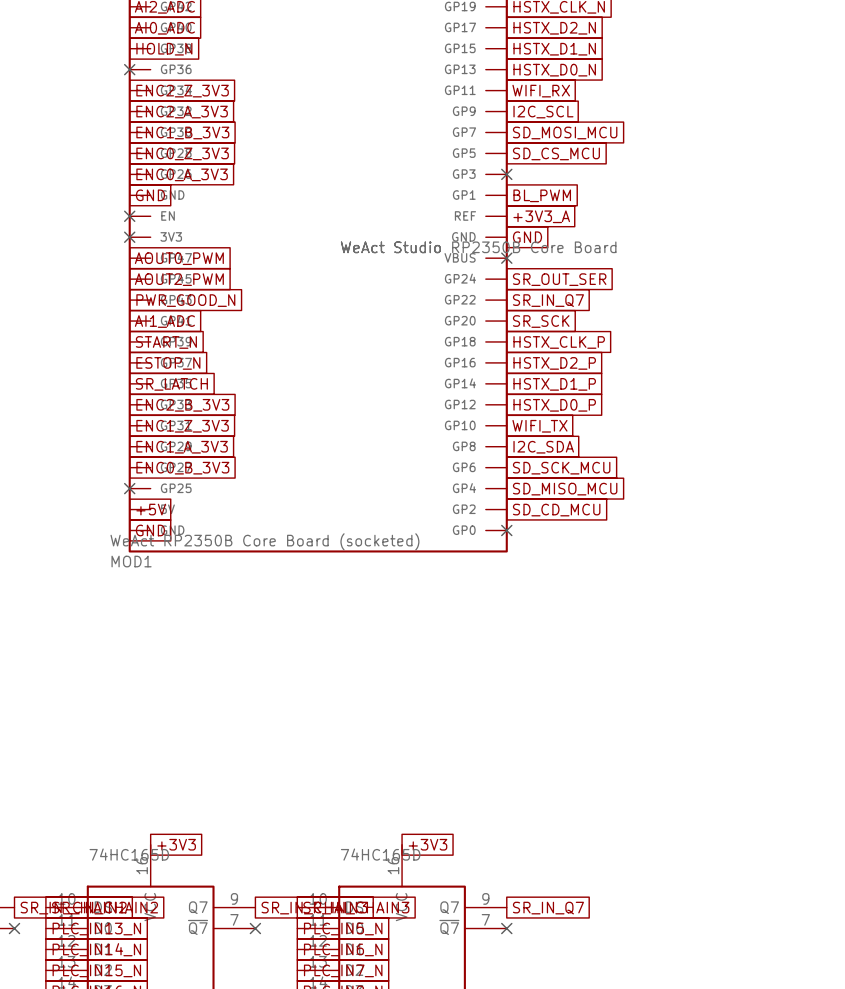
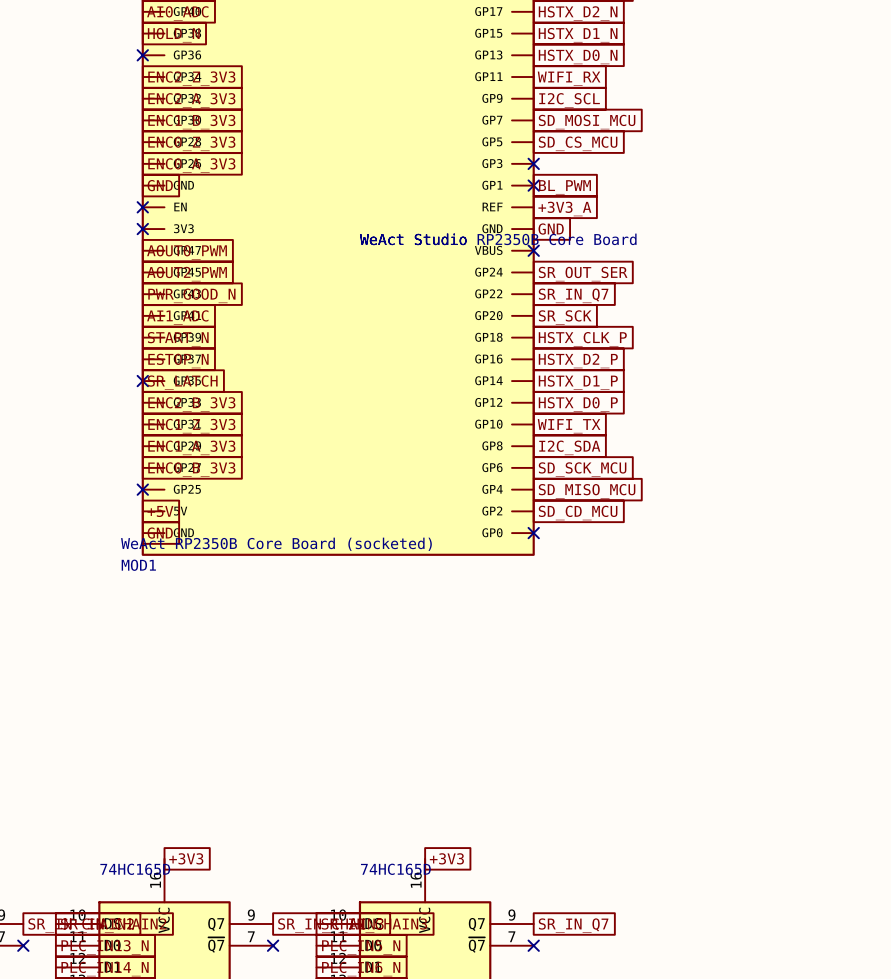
no-connect mark: none -> (533, 185)
no-connect mark: none -> (142, 381)

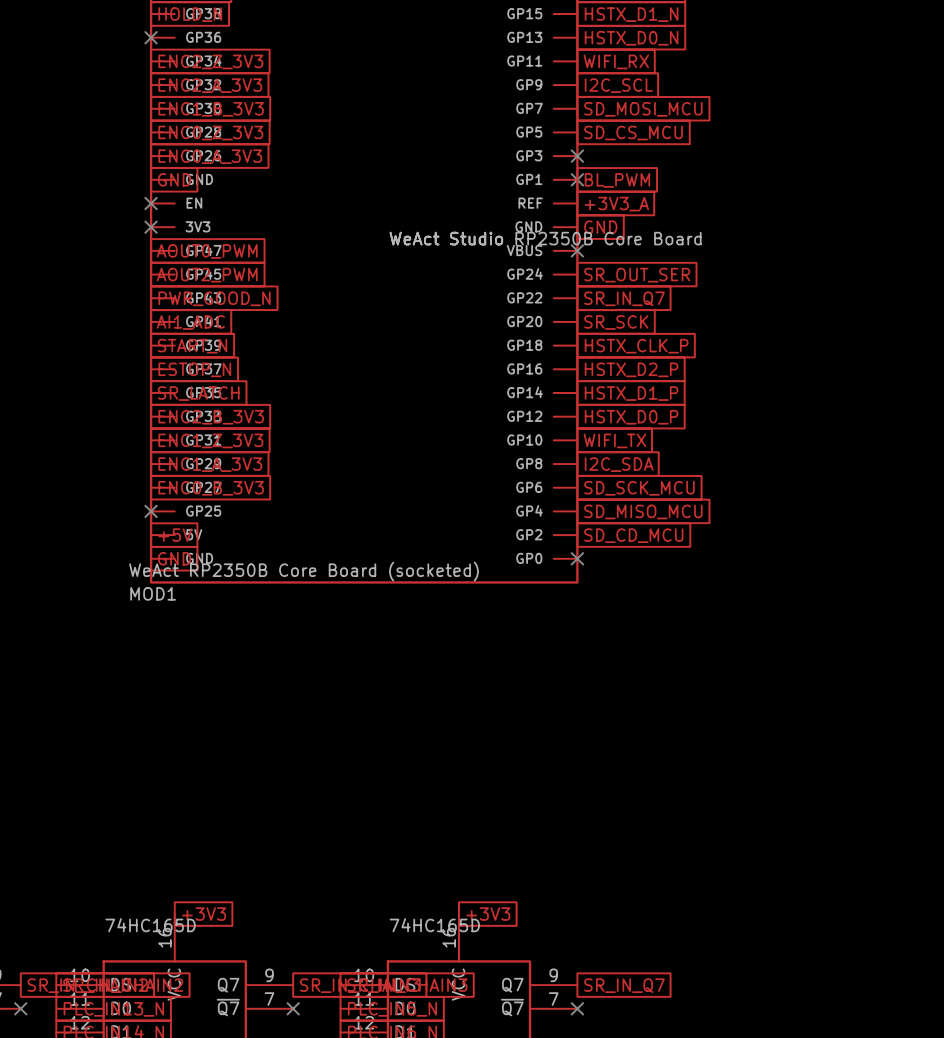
no-connect mark: (142, 381) -> none

